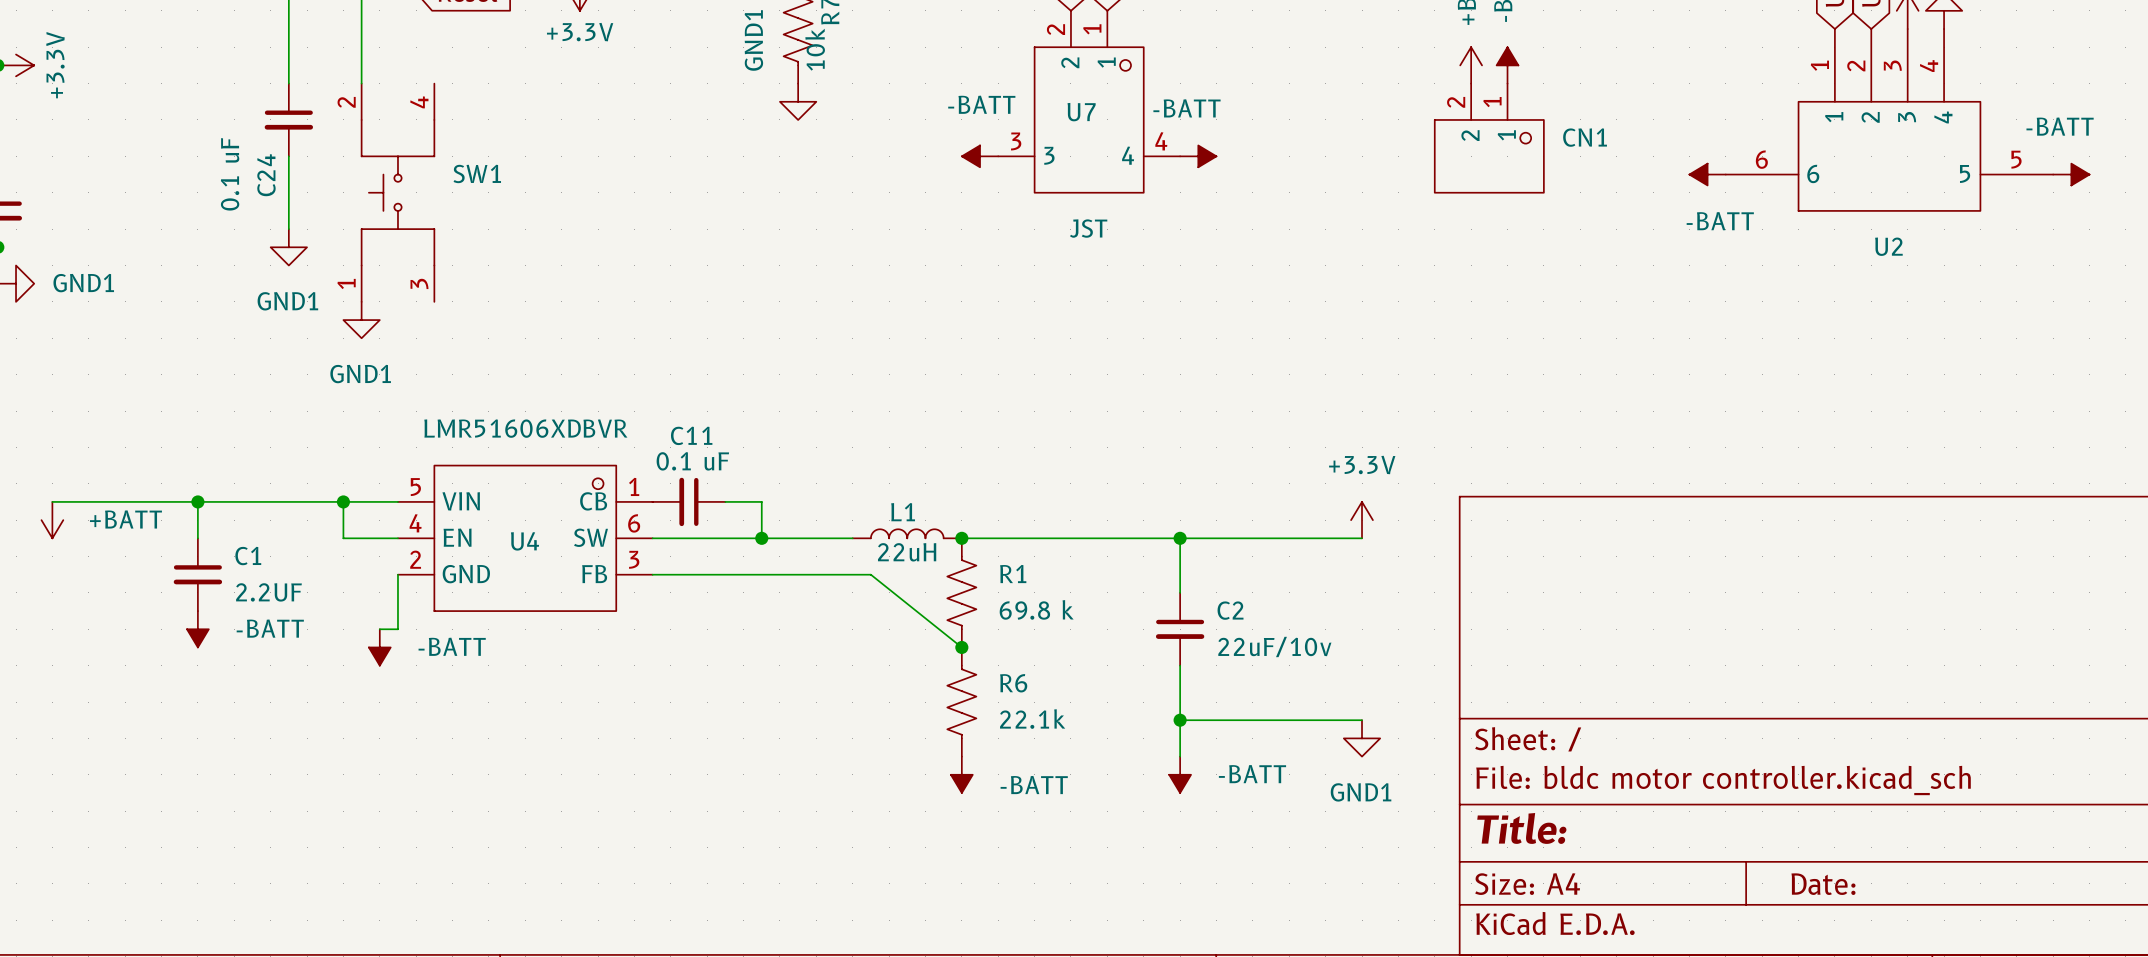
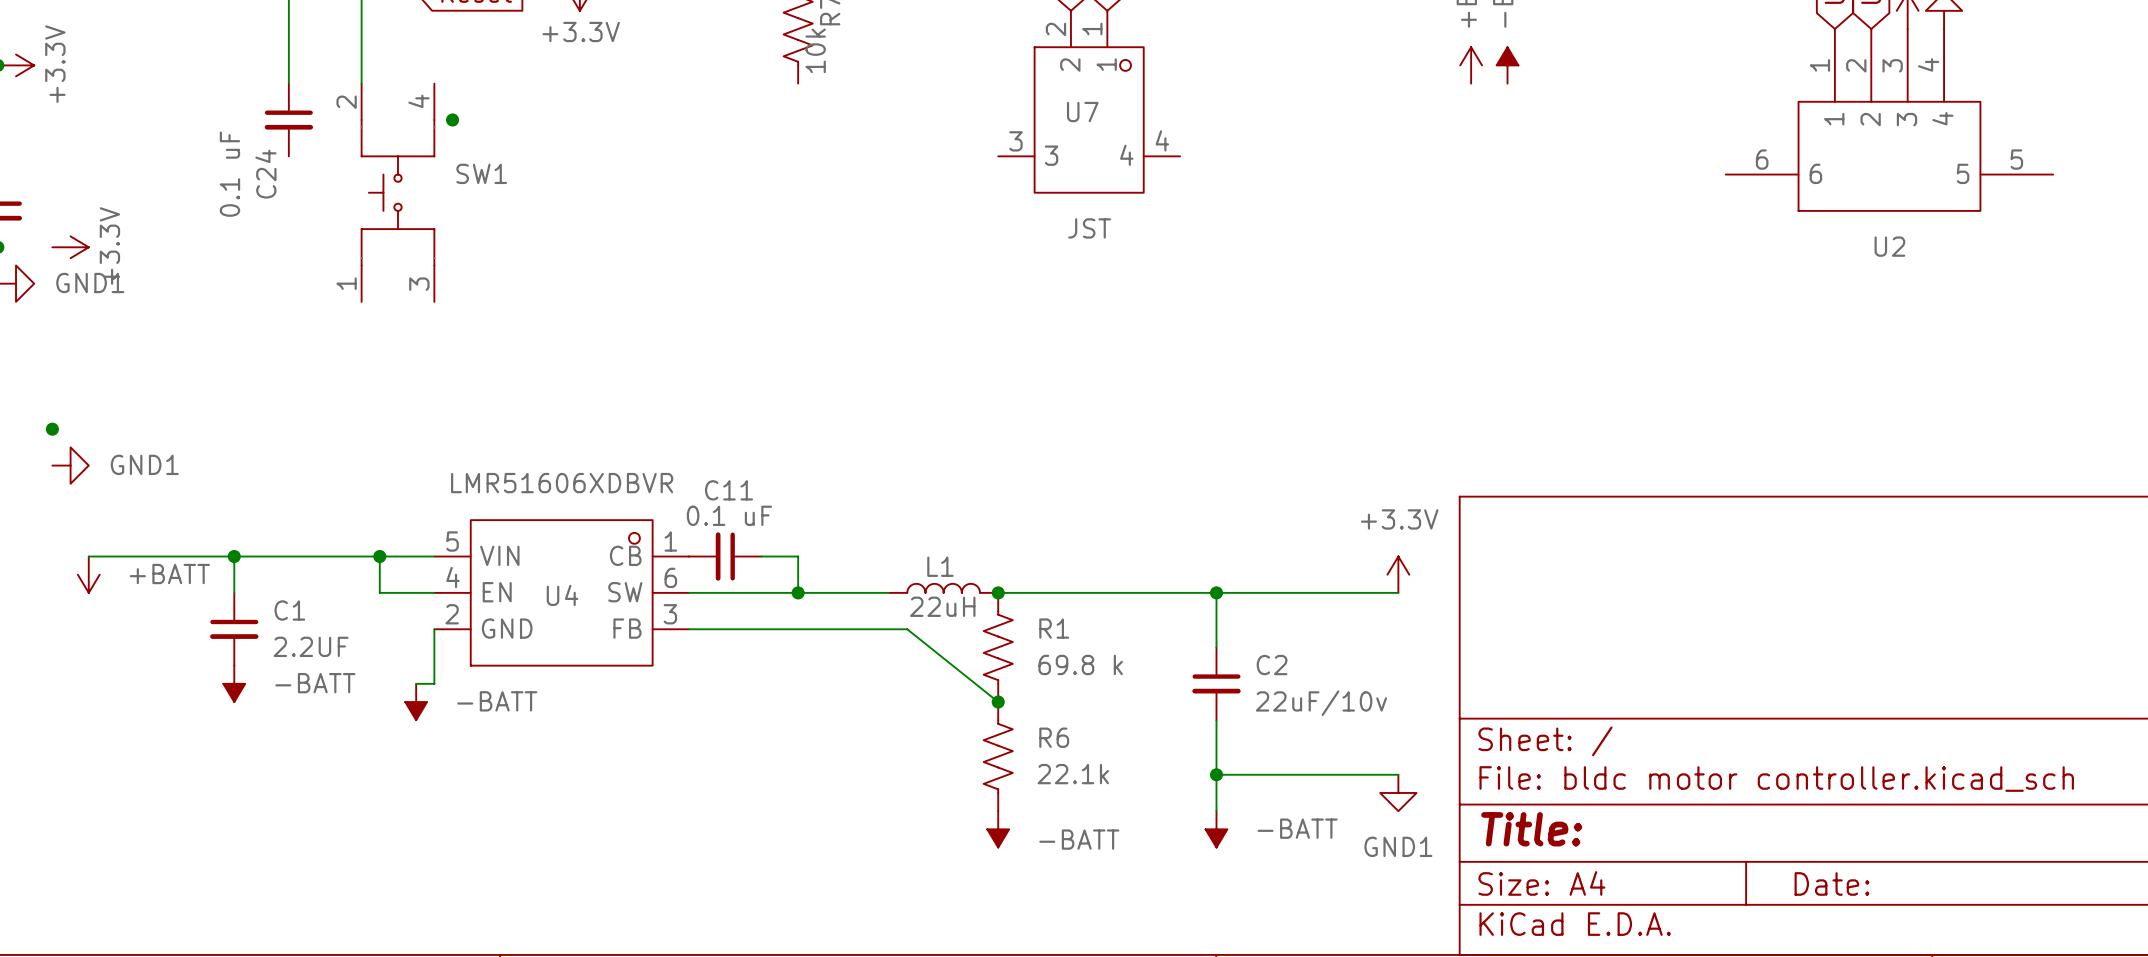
power symbol: GND1 (798, 101) -> none
junction: none -> (452, 119)
CN1: (1489, 138) -> none
wire: (288, 156) (288, 229) -> none
power symbol: -BATT (980, 156) -> none
power symbol: -BATT (1198, 156) -> none
power symbol: -BATT (1707, 174) -> none
power symbol: -BATT (2071, 174) -> none
power symbol: none -> +3.3V (70, 247)
power symbol: GND1 (288, 247) -> none
power symbol: GND1 (361, 320) -> none
junction: none -> (52, 429)
power symbol: none -> GND1 (70, 465)
wire: (52, 501) (397, 501) -> (88, 556) (434, 556)
wire: (197, 501) (197, 538) -> (234, 556) (234, 592)
junction: (197, 501) -> none
wire: (343, 501) (343, 538) (397, 538) -> (379, 556) (379, 592) (434, 592)
junction: (343, 501) -> none
C11 position: (689, 501) -> (725, 556)
wire: (725, 501) (761, 501) (761, 538) -> (761, 556) (798, 556) (798, 592)
power symbol position: +BATT (52, 520) -> +BATT (88, 574)
power symbol position: +3.3V (1362, 520) -> +3.3V (1398, 574)
L1 position: (907, 533) -> (943, 588)
U4 position: (525, 538) -> (561, 592)
wire: (652, 538) (852, 538) -> (689, 592) (889, 592)
junction position: (761, 538) -> (798, 592)
wire: (961, 538) (1362, 538) -> (998, 592) (1398, 592)
junction: (961, 538) -> none
wire: (1180, 538) (1180, 592) -> (1216, 592) (1216, 647)
junction position: (1180, 538) -> (1216, 592)
junction: none -> (234, 556)
junction: none -> (379, 556)
C1 position: (197, 574) -> (234, 629)
wire: (397, 574) (397, 629) (379, 629) -> (434, 629) (434, 683) (416, 683)
wire: (652, 574) (870, 574) (961, 647) -> (689, 629) (907, 629) (998, 702)
R1 position: (961, 592) -> (998, 647)
junction: none -> (998, 592)
power symbol position: -BATT (197, 629) -> -BATT (234, 683)
C2 position: (1180, 629) -> (1216, 683)
power symbol position: -BATT (379, 647) -> -BATT (416, 702)
junction: (961, 647) -> none
wire: (1180, 665) (1180, 756) -> (1216, 720) (1216, 811)
R6 position: (961, 702) -> (998, 756)
junction: none -> (998, 702)
wire: (1180, 720) (1362, 720) -> (1216, 774) (1398, 774)
junction position: (1180, 720) -> (1216, 774)
power symbol position: GND1 (1362, 738) -> GND1 (1398, 792)
power symbol position: -BATT (961, 774) -> -BATT (998, 829)
power symbol position: -BATT (1180, 774) -> -BATT (1216, 829)

